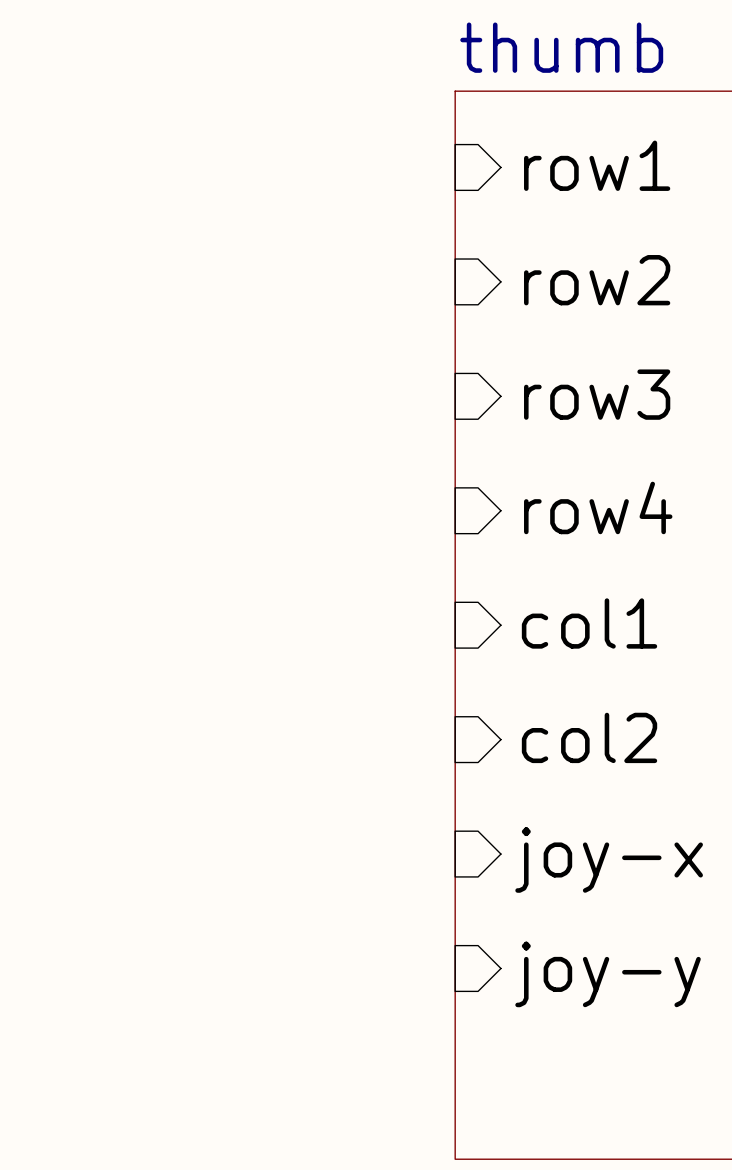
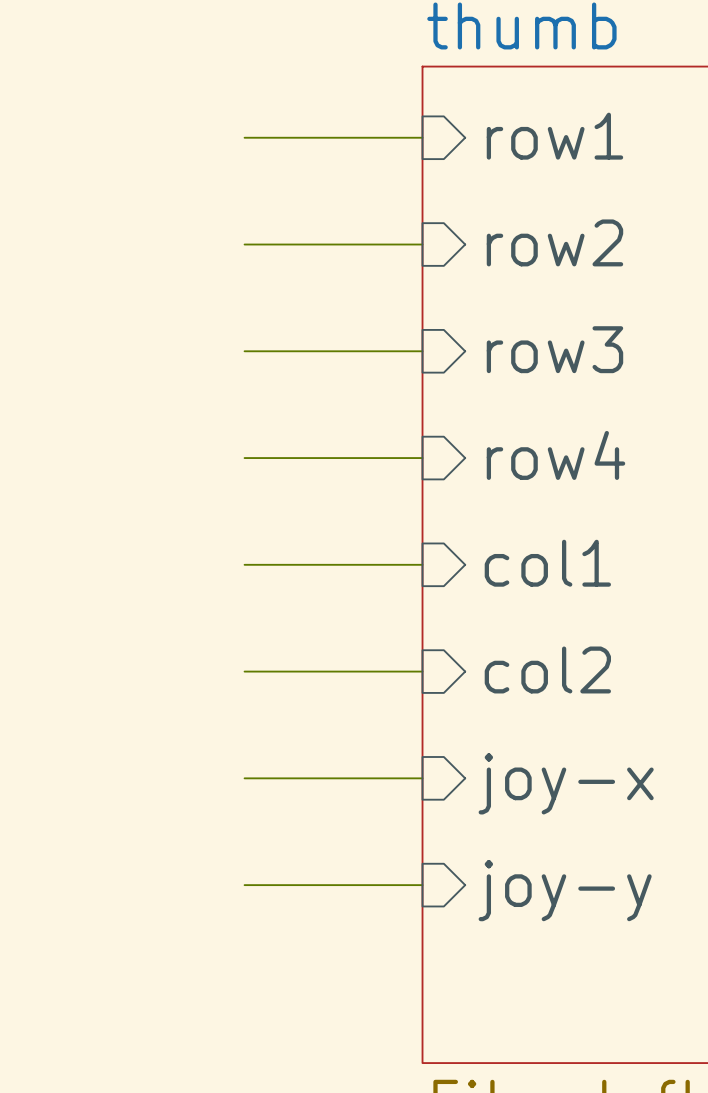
wire: none -> (244, 137) (422, 137)
wire: none -> (244, 244) (422, 244)
wire: none -> (244, 351) (422, 351)
wire: none -> (244, 458) (422, 458)
wire: none -> (244, 564) (422, 564)
wire: none -> (244, 671) (422, 671)
wire: none -> (244, 778) (422, 778)
wire: none -> (244, 885) (422, 885)

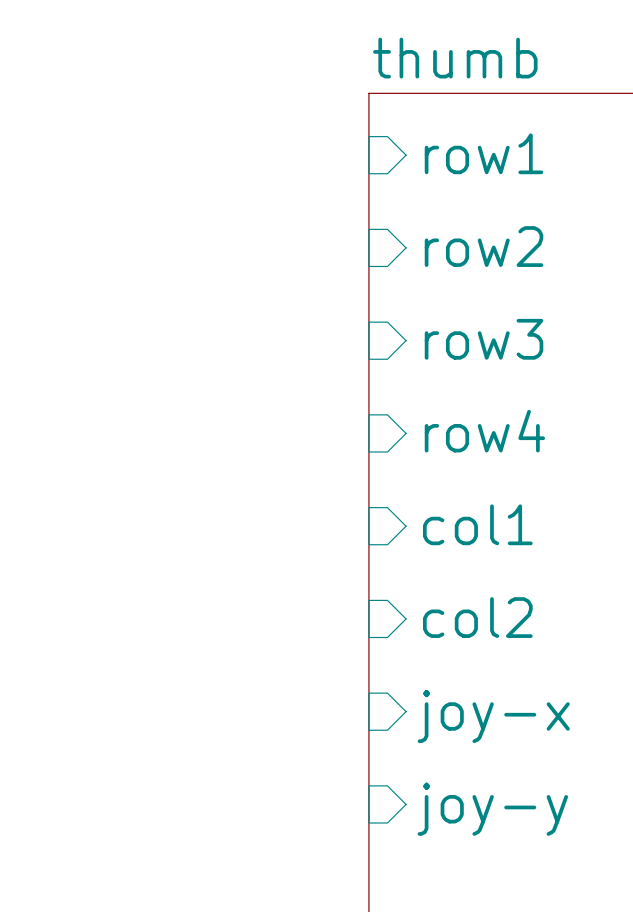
wire: (244, 137) (422, 137) -> none
wire: (244, 244) (422, 244) -> none
wire: (244, 351) (422, 351) -> none
wire: (244, 458) (422, 458) -> none
wire: (244, 564) (422, 564) -> none
wire: (244, 671) (422, 671) -> none
wire: (244, 778) (422, 778) -> none
wire: (244, 885) (422, 885) -> none

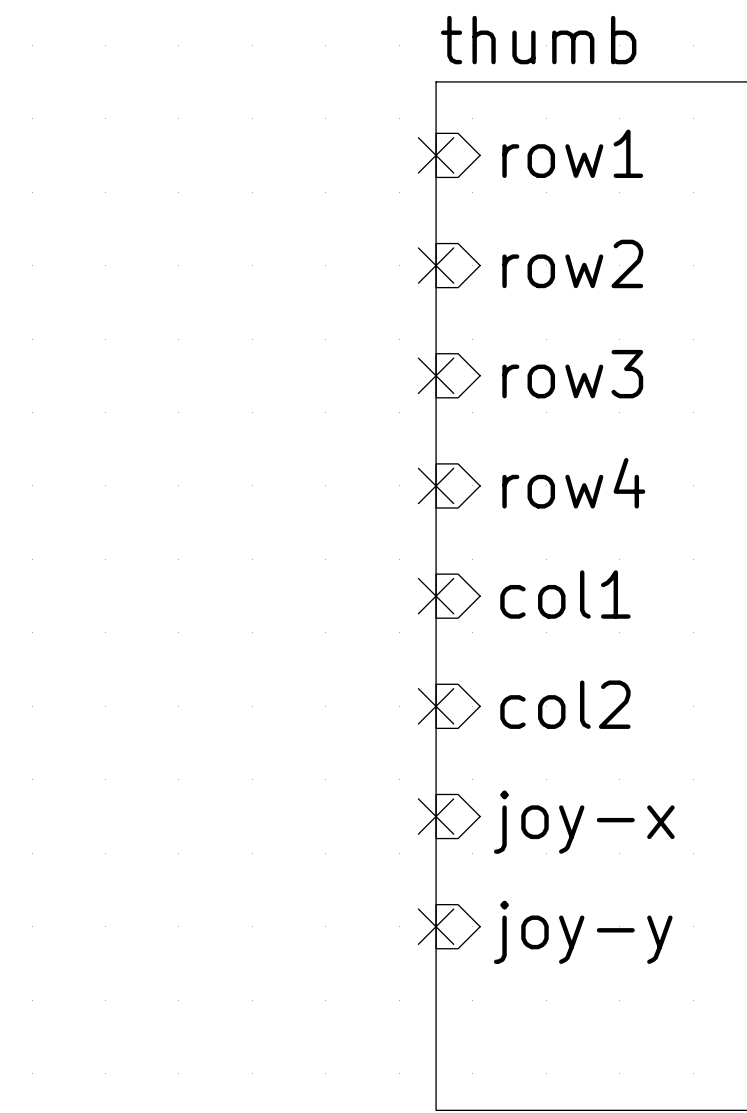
no-connect mark: none -> (436, 155)
no-connect mark: none -> (436, 265)
no-connect mark: none -> (436, 375)
no-connect mark: none -> (436, 485)
no-connect mark: none -> (436, 596)
no-connect mark: none -> (436, 706)
no-connect mark: none -> (436, 816)
no-connect mark: none -> (436, 926)

